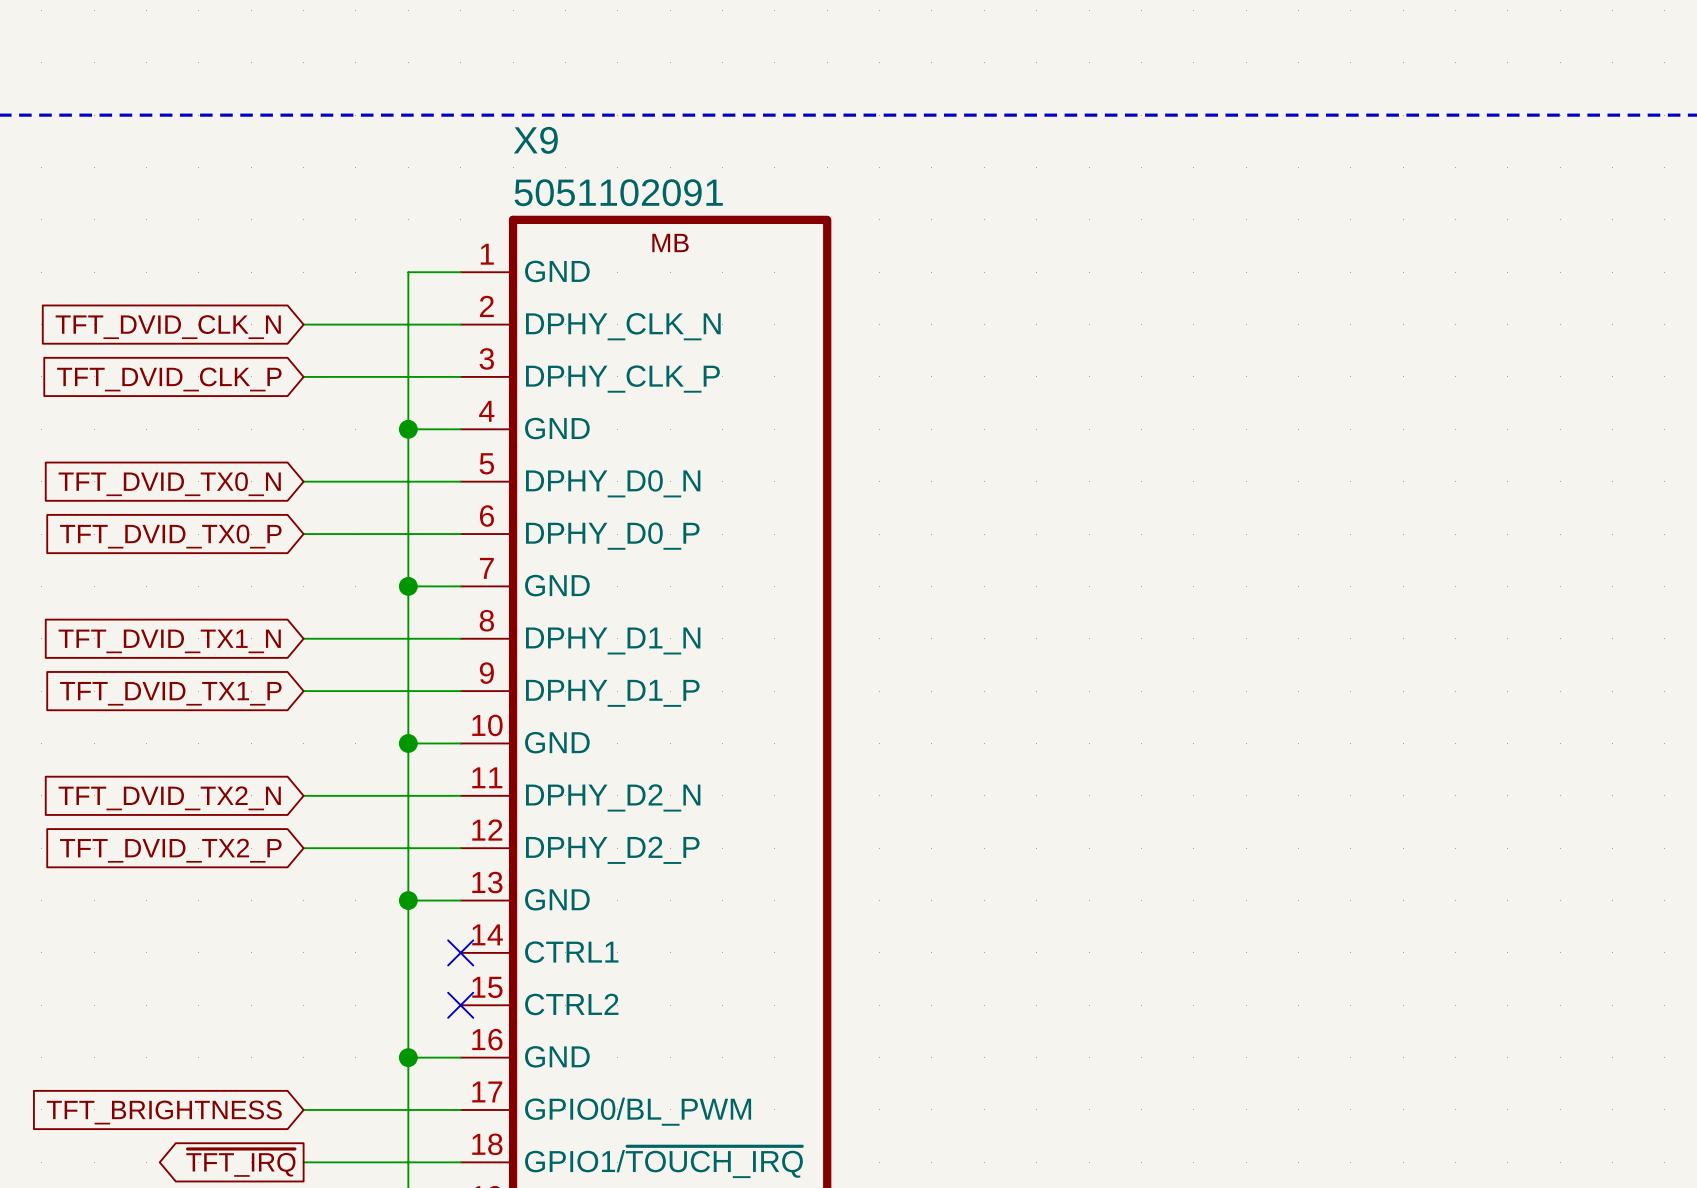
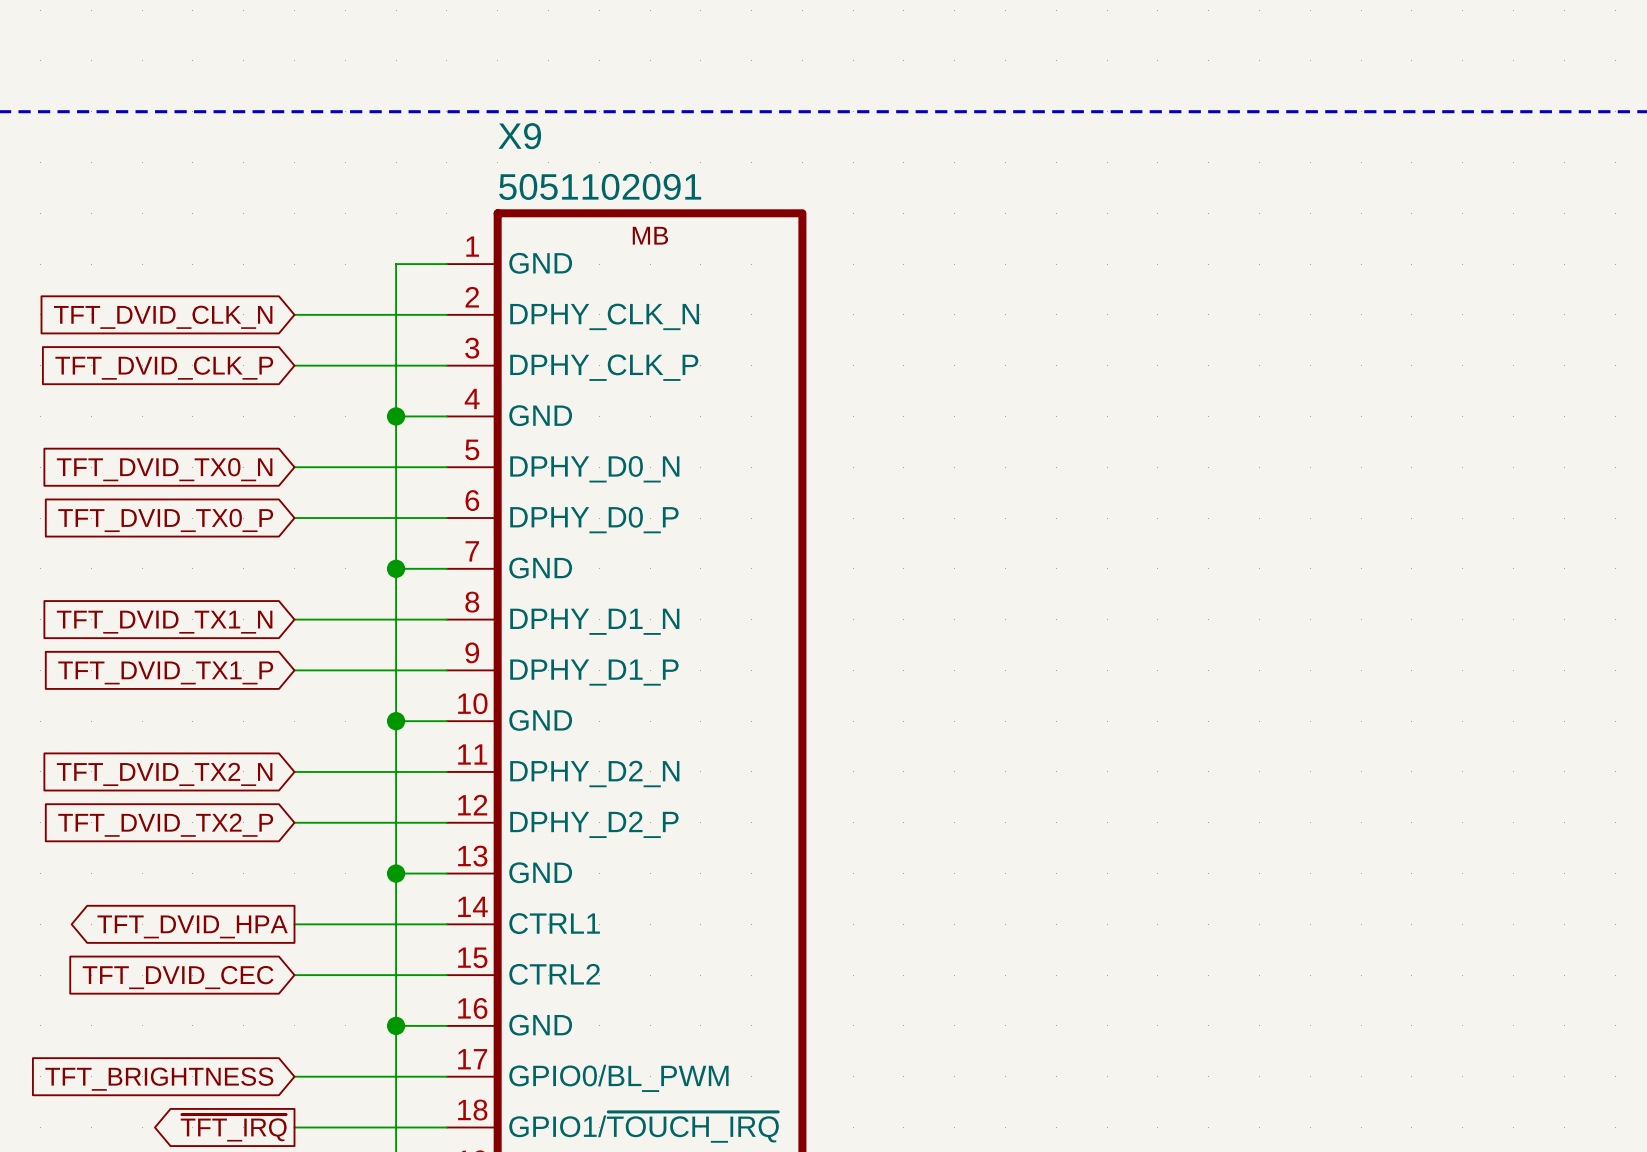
wire: none -> (294, 924) (446, 924)
no-connect mark: (460, 952) -> none
global label: none -> TFT_DVID_HPA (192, 926)
wire: none -> (294, 975) (446, 975)
no-connect mark: (460, 1005) -> none
global label: none -> TFT_DVID_CEC (178, 977)

